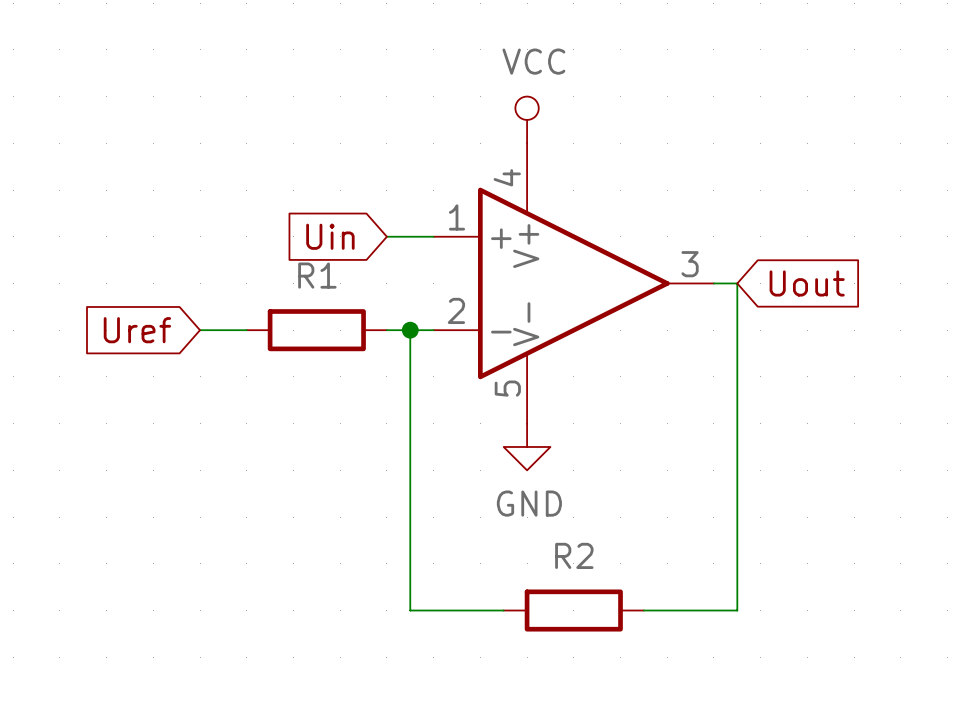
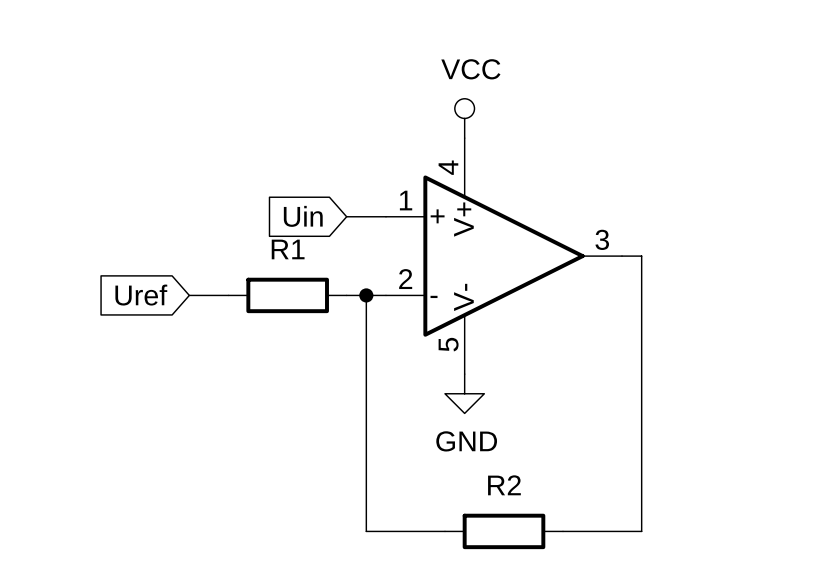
global label: Uout (807, 283) -> none

